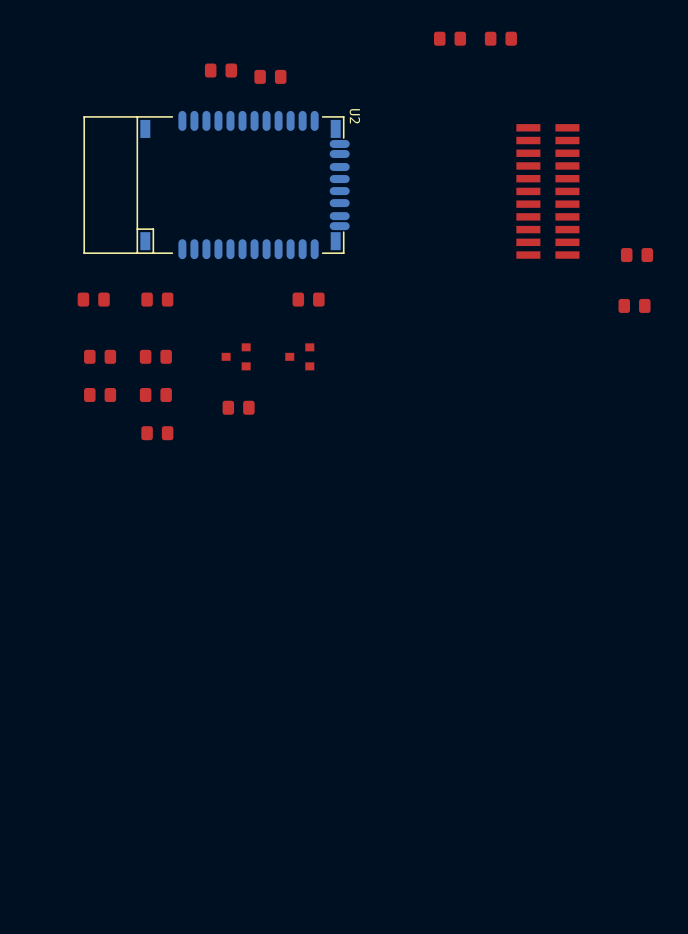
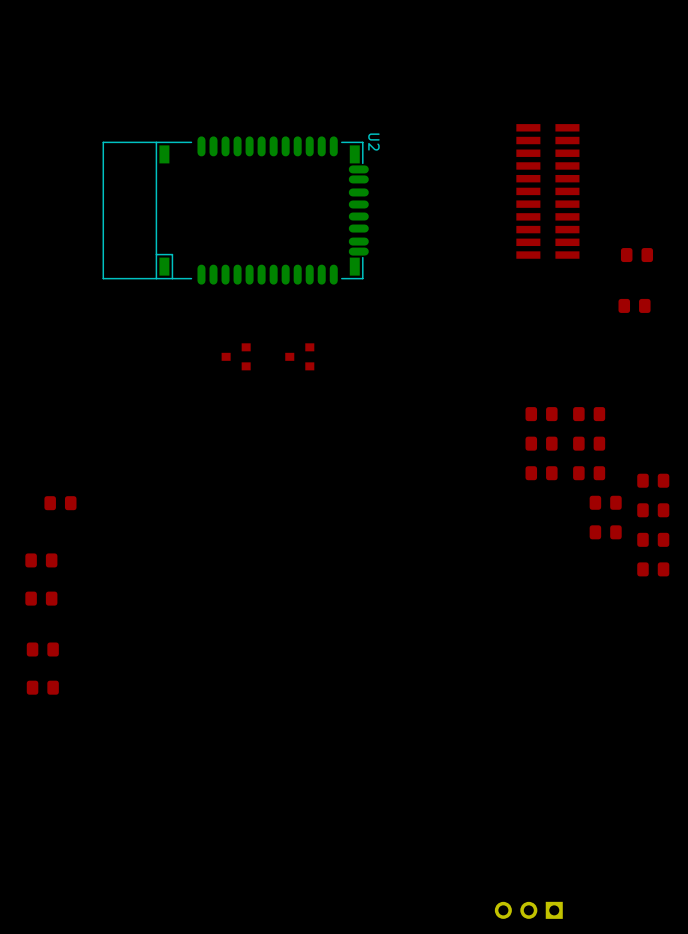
part: (450, 38) -> none
part: (500, 38) -> none
part: (220, 70) -> none
part: (270, 76) -> none
U2 position: (216, 185) -> (235, 210)
part: (93, 299) -> none
part: (157, 299) -> none
part: (308, 299) -> none
part: (100, 356) -> none
part: (155, 356) -> none
part: (100, 395) -> none
part: (155, 395) -> none
part: (238, 407) -> none
part: none -> (541, 414)
part: none -> (589, 414)
part: (157, 433) -> none
part: none -> (541, 443)
part: none -> (589, 443)
part: none -> (541, 473)
part: none -> (589, 473)
part: none -> (653, 480)
part: none -> (605, 502)
part: none -> (60, 503)
part: none -> (653, 510)
part: none -> (605, 532)
part: none -> (653, 539)
part: none -> (41, 560)
part: none -> (653, 569)
part: none -> (41, 598)
part: none -> (42, 649)
part: none -> (42, 687)
part: none -> (528, 910)

